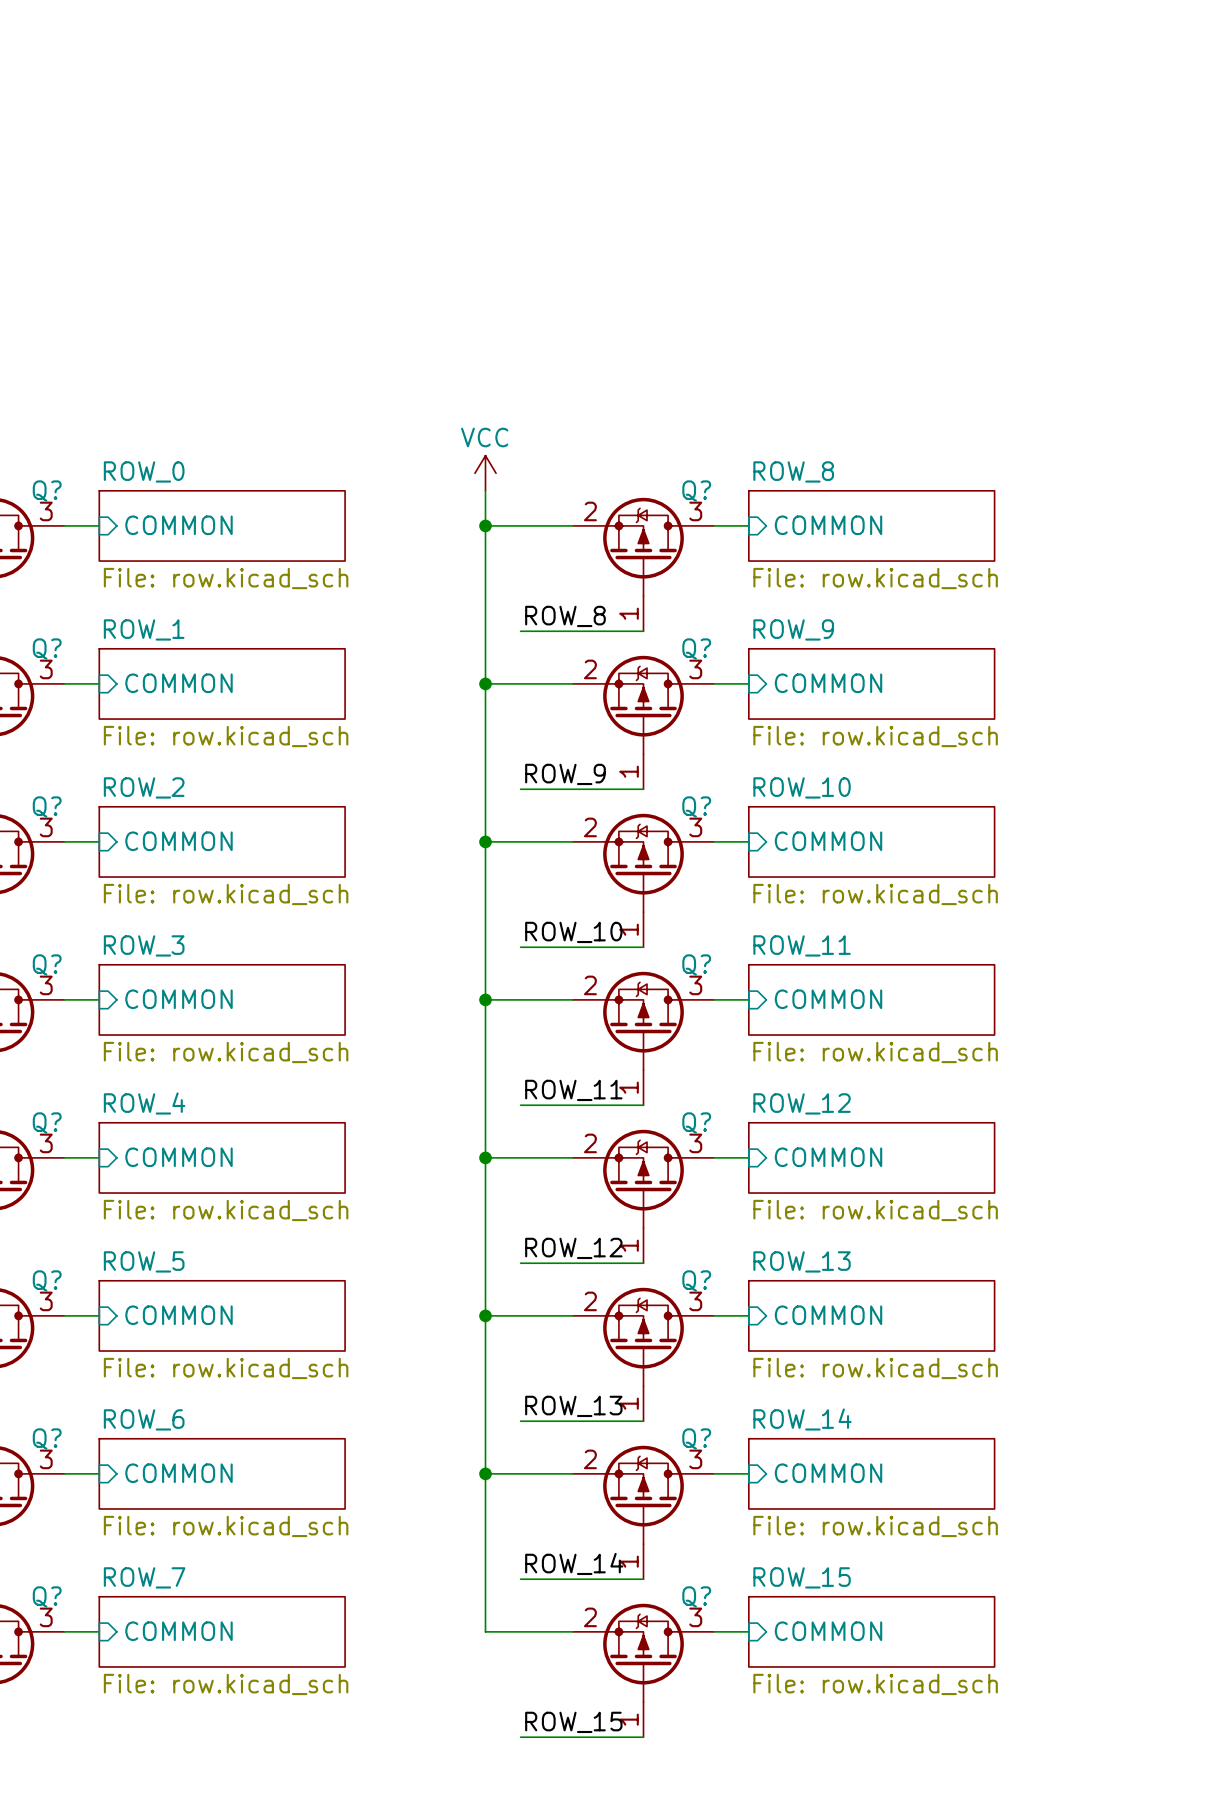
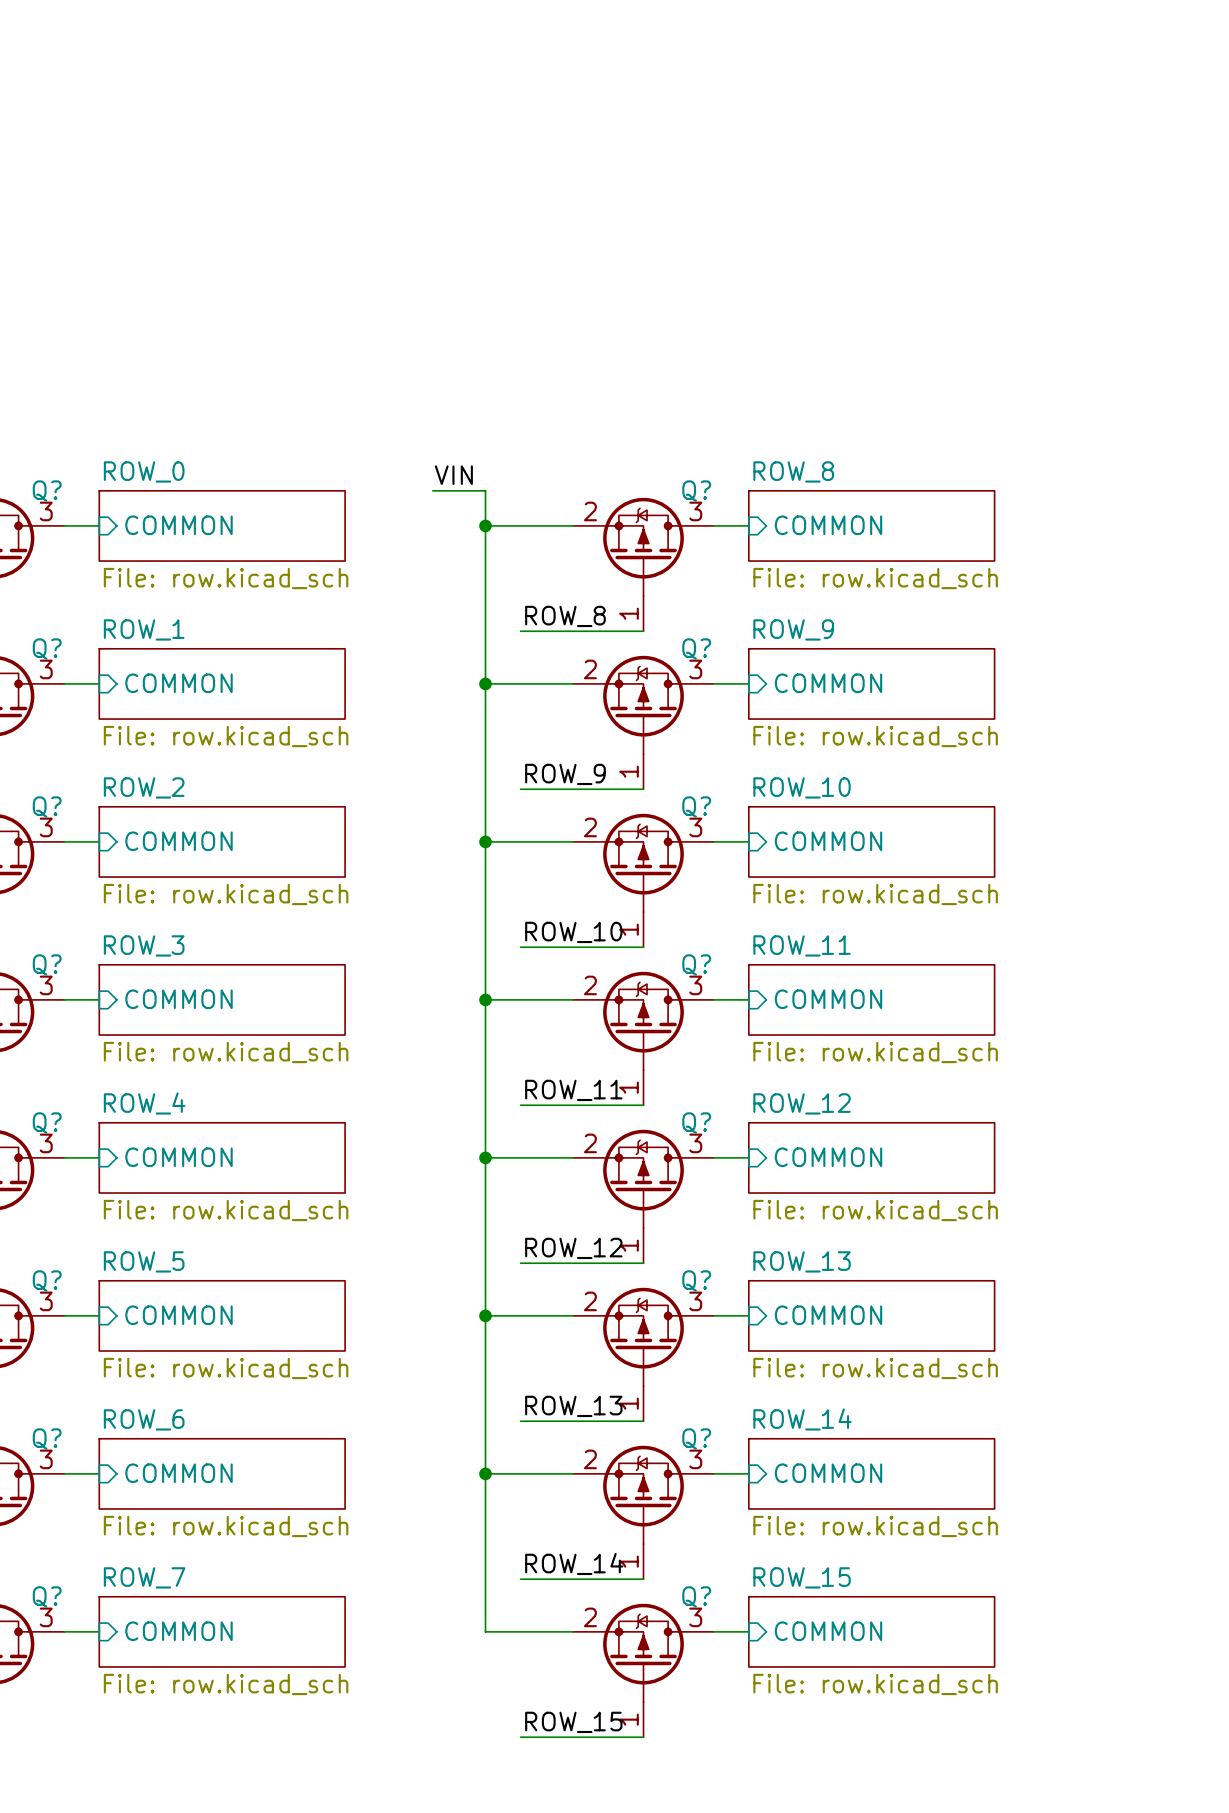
power symbol: VCC (485, 473) -> none
label: none -> VIN (453, 475)
wire: none -> (432, 490) (485, 490)

